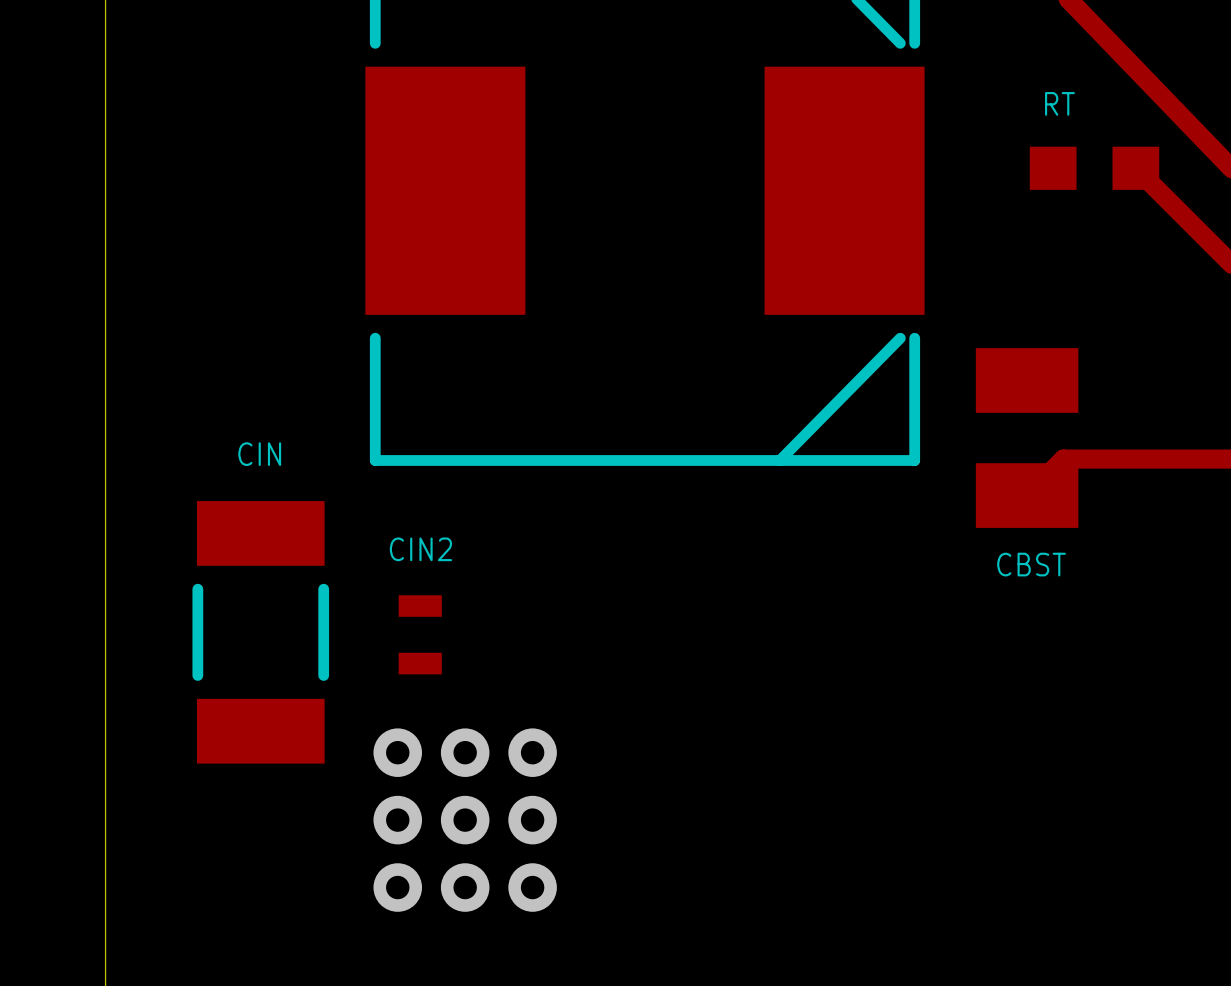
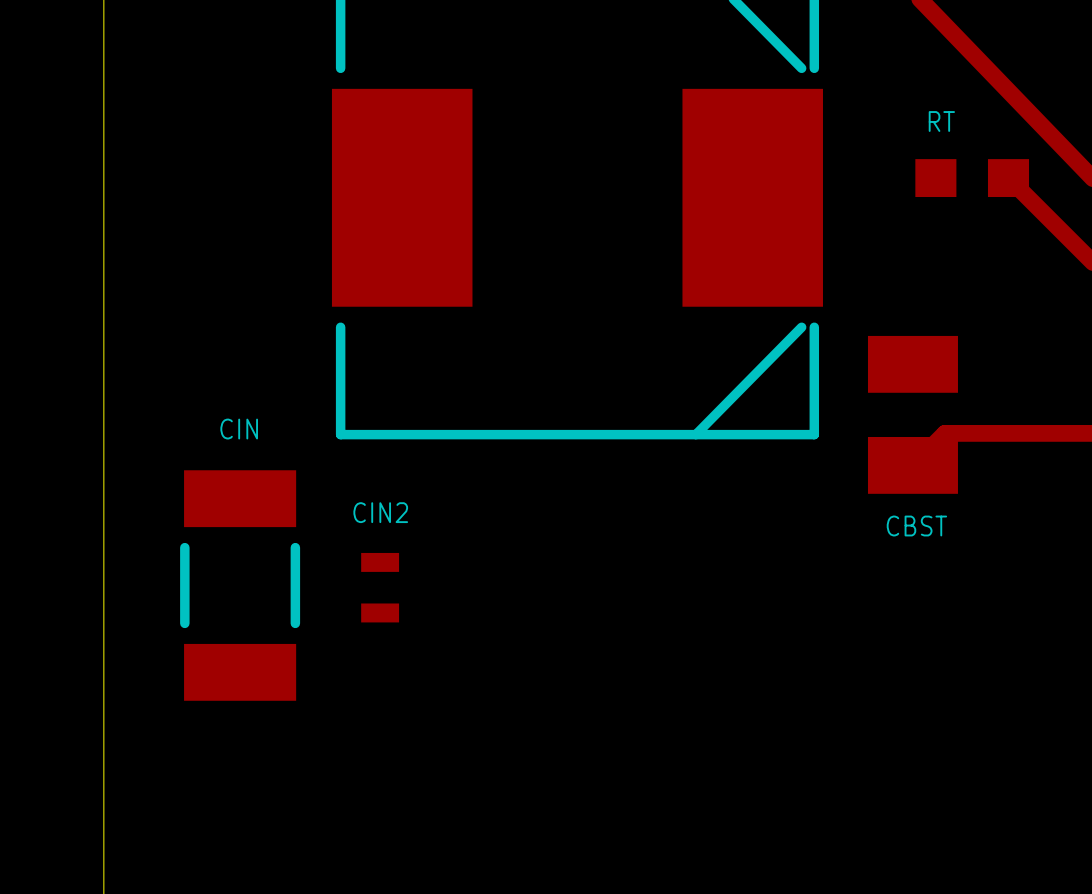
via: (397, 752) -> none
via: (465, 752) -> none
via: (532, 752) -> none
via: (397, 820) -> none
via: (465, 820) -> none
via: (532, 820) -> none
via: (397, 887) -> none
via: (465, 887) -> none
via: (532, 887) -> none

